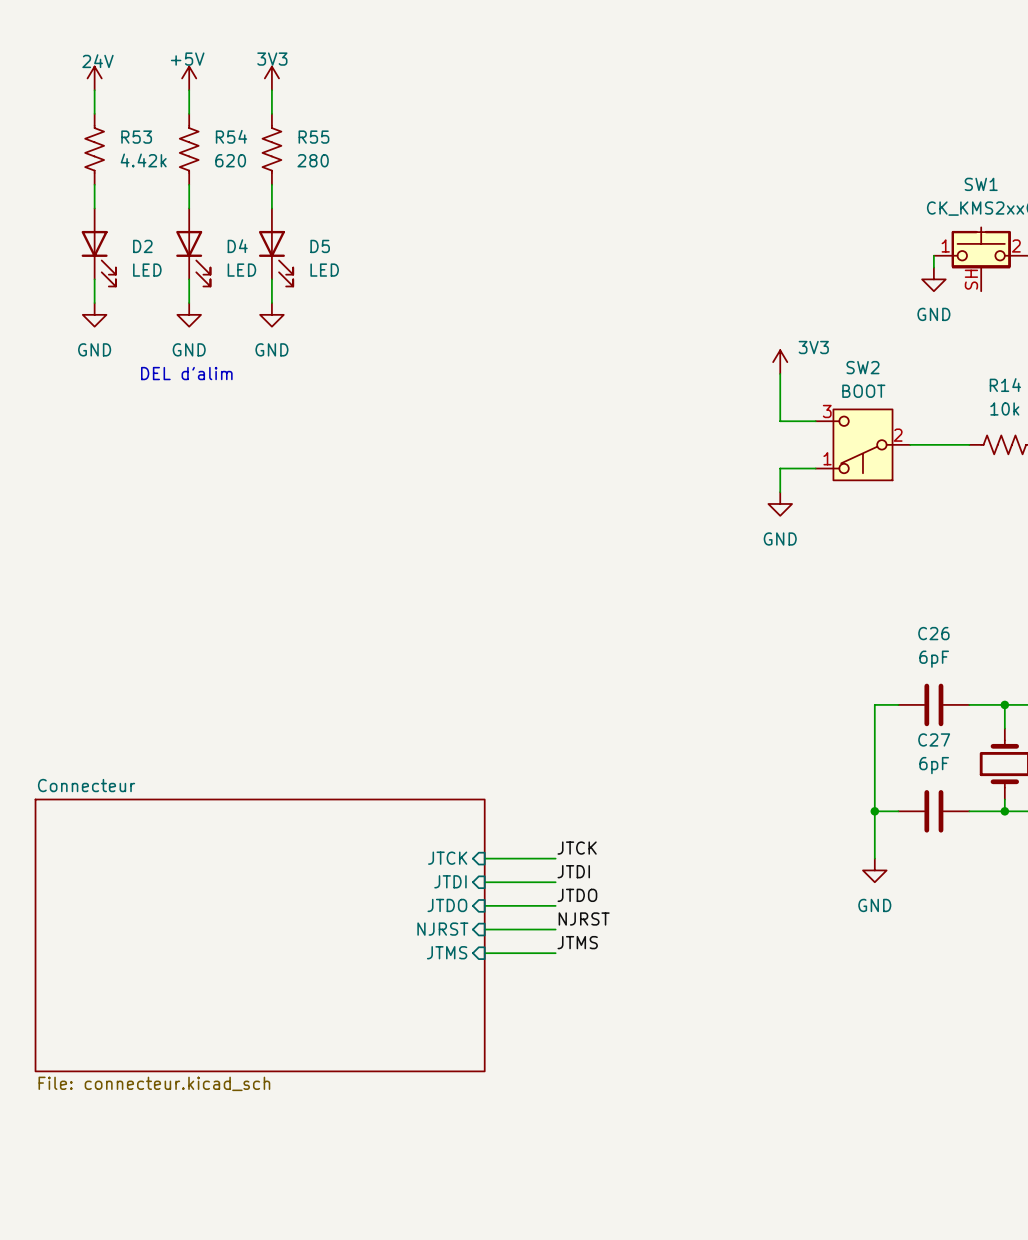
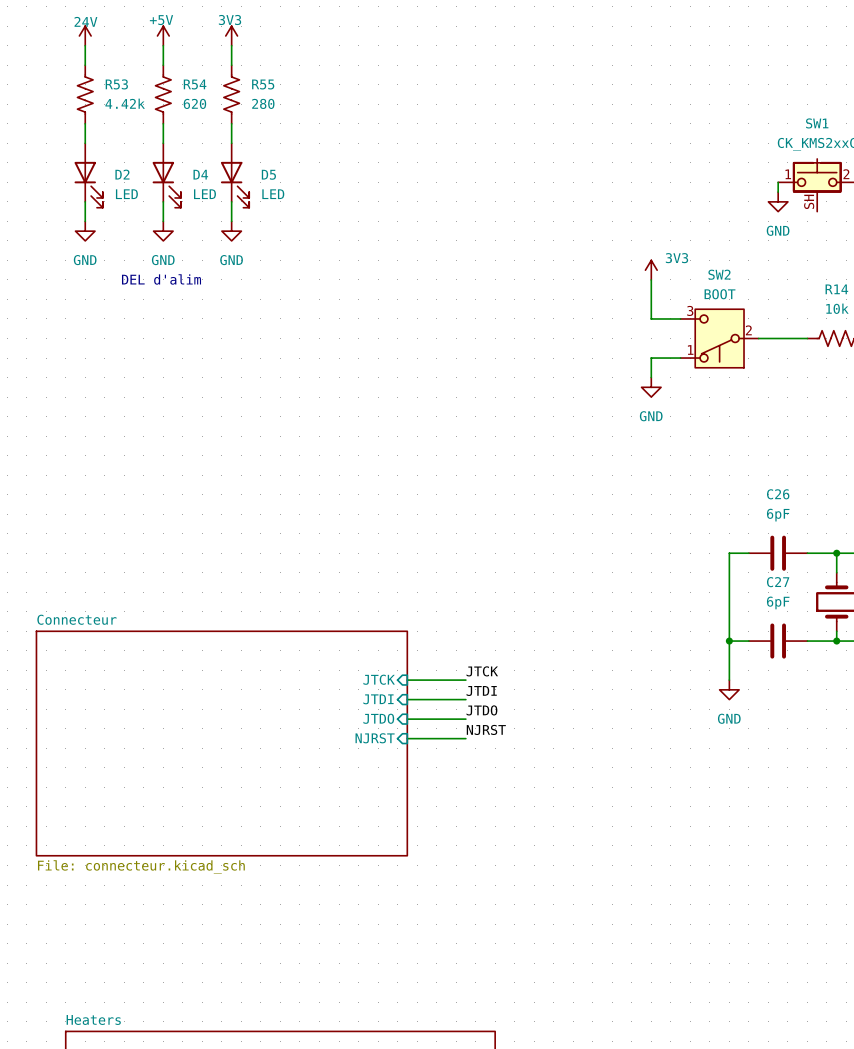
label: JTMS (577, 942) -> none
sheet pin: JTMS (447, 952) -> none
wire: (484, 953) (555, 953) -> none

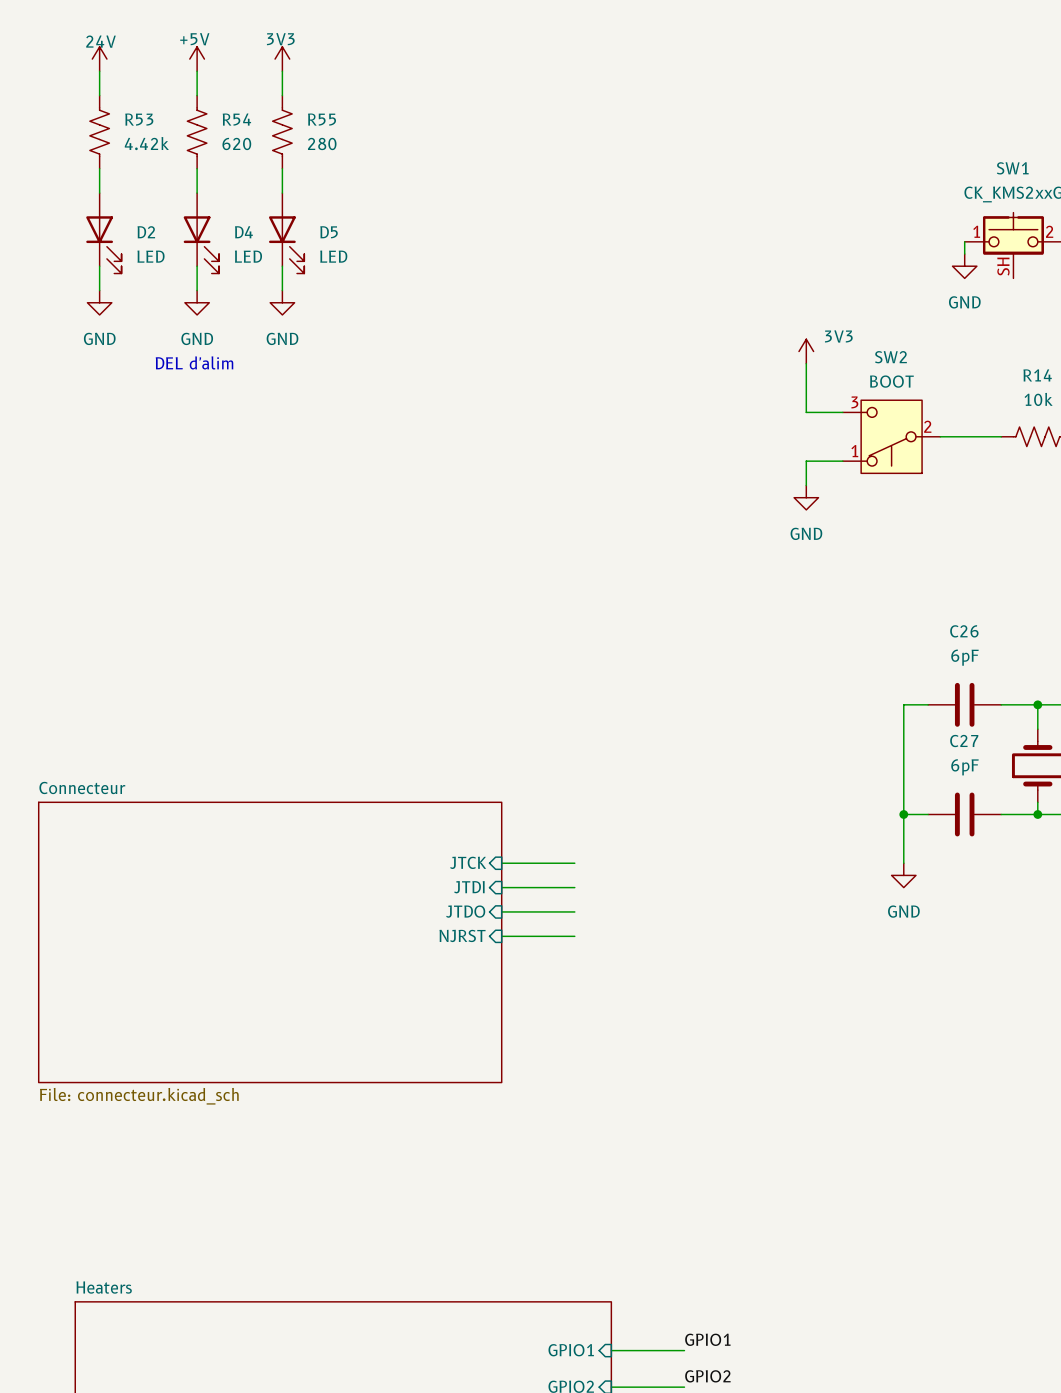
label: JTCK (482, 671) -> none
label: JTDI (481, 690) -> none
label: JTDO (481, 710) -> none
label: NJRST (486, 729) -> none

